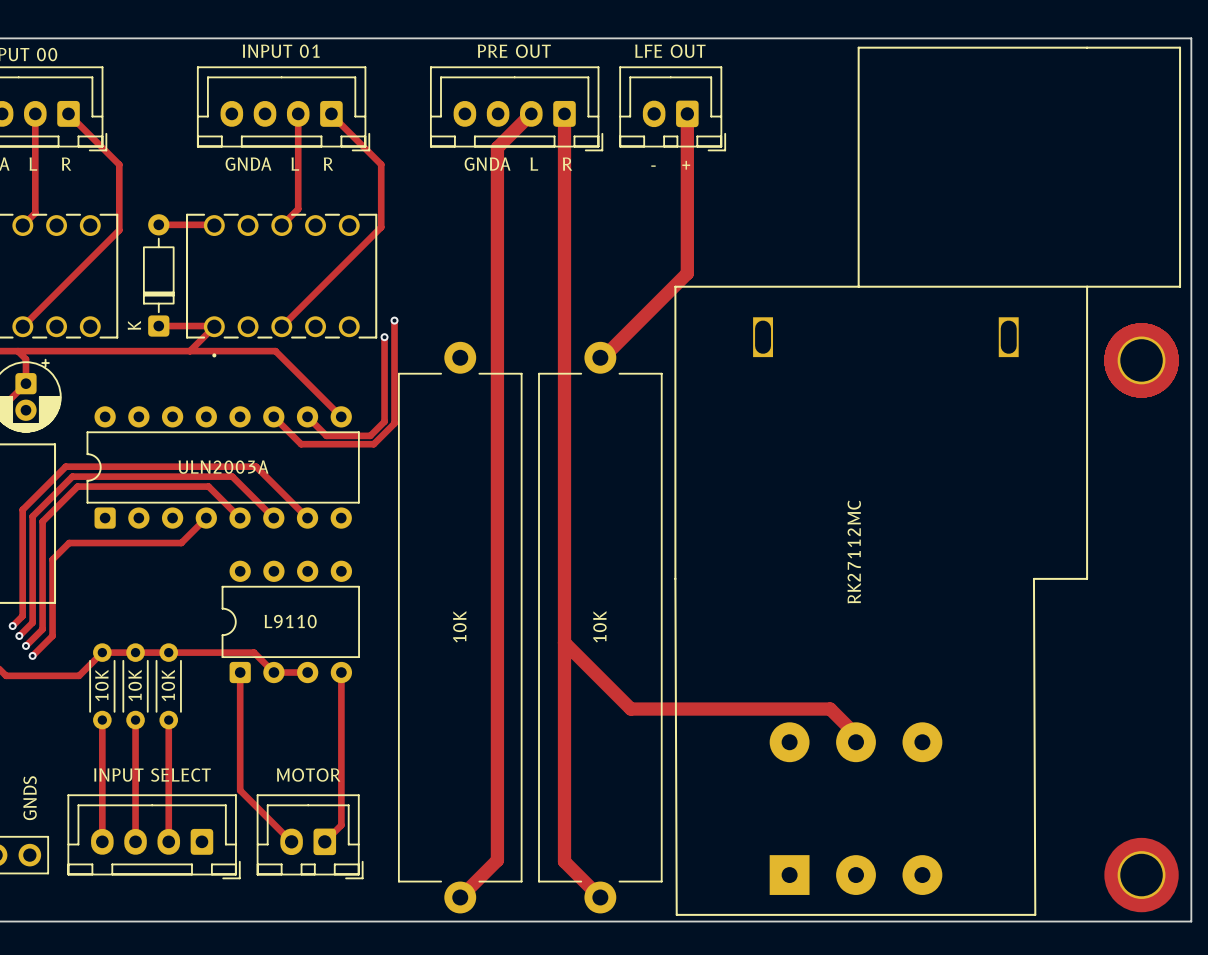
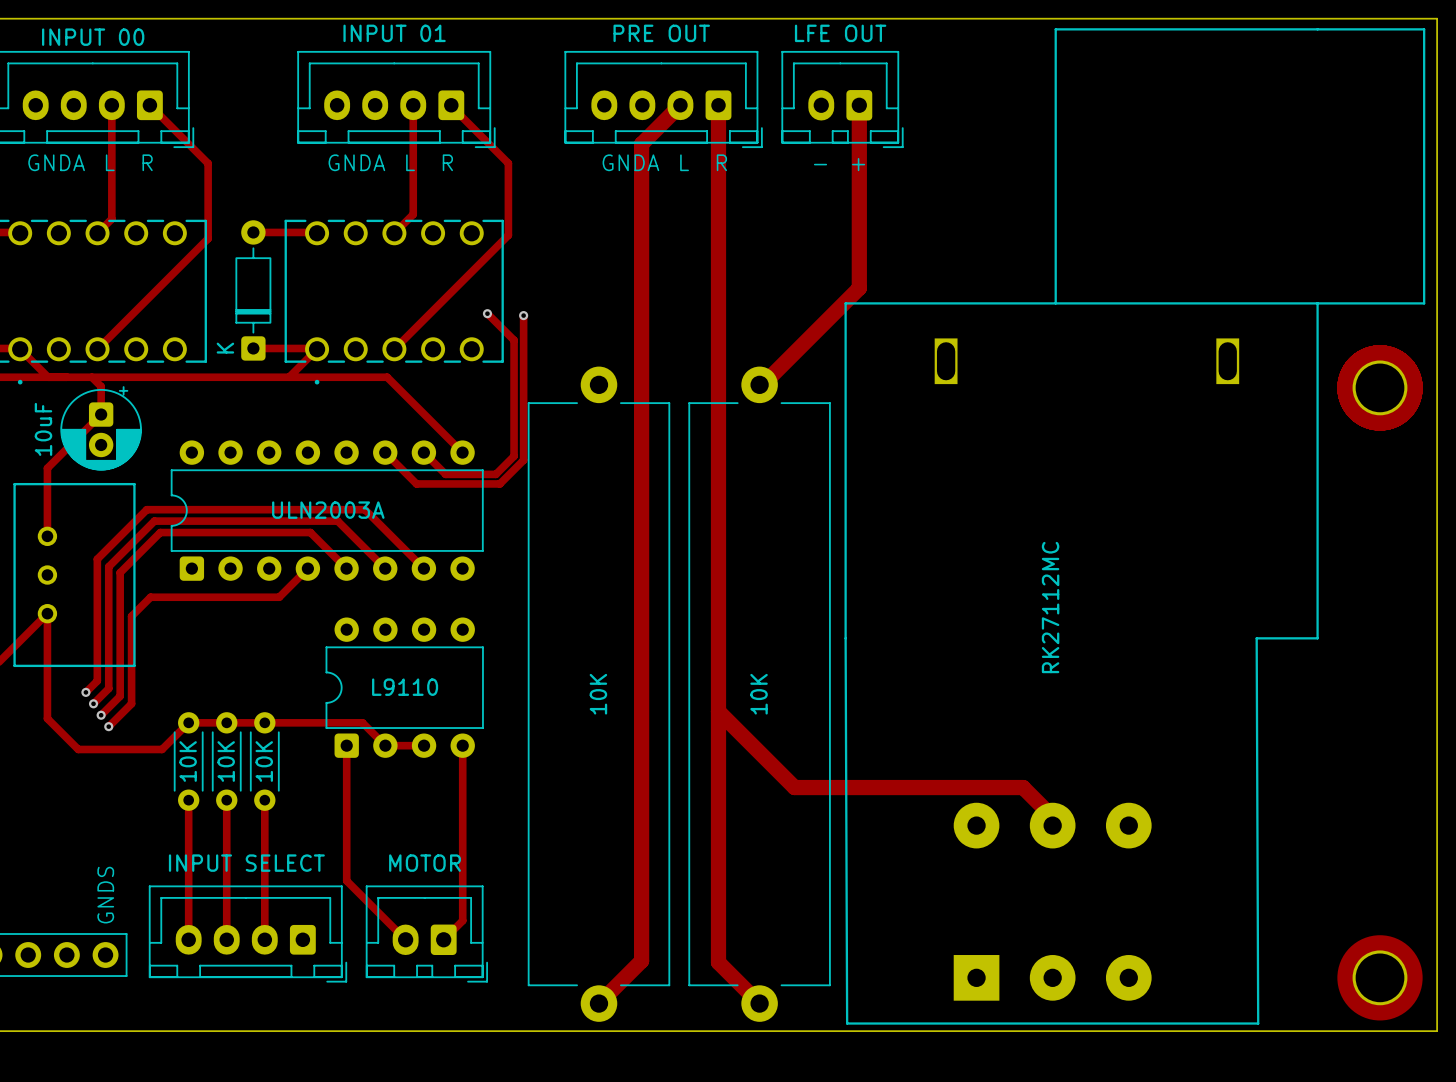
via: none -> (487, 313)
track: none -> (523, 315) (523, 342)
via: none -> (523, 315)
via: (394, 320) -> none
track: (384, 337) (384, 421) -> (487, 313) (514, 340) (514, 456) (512, 458)
via: (384, 337) -> none

